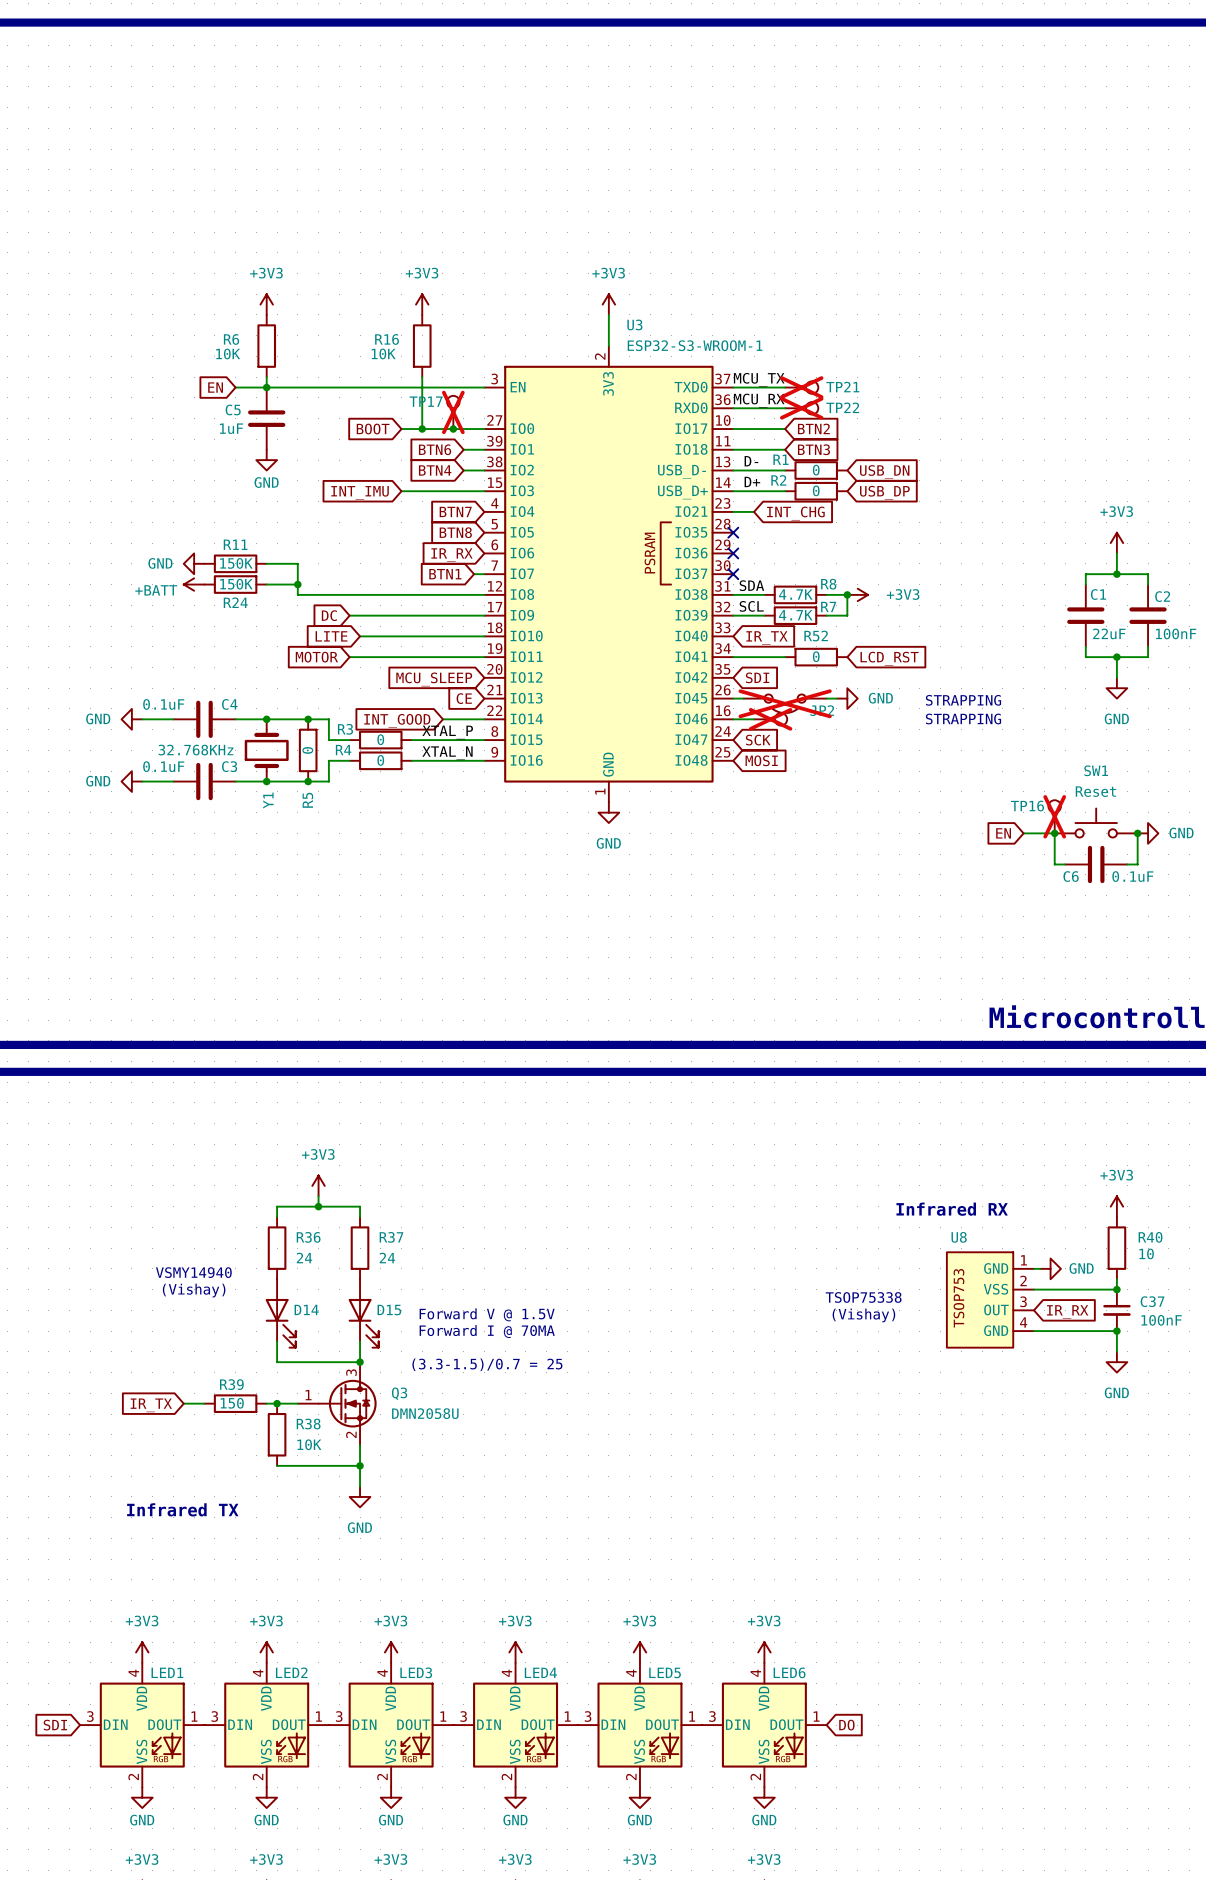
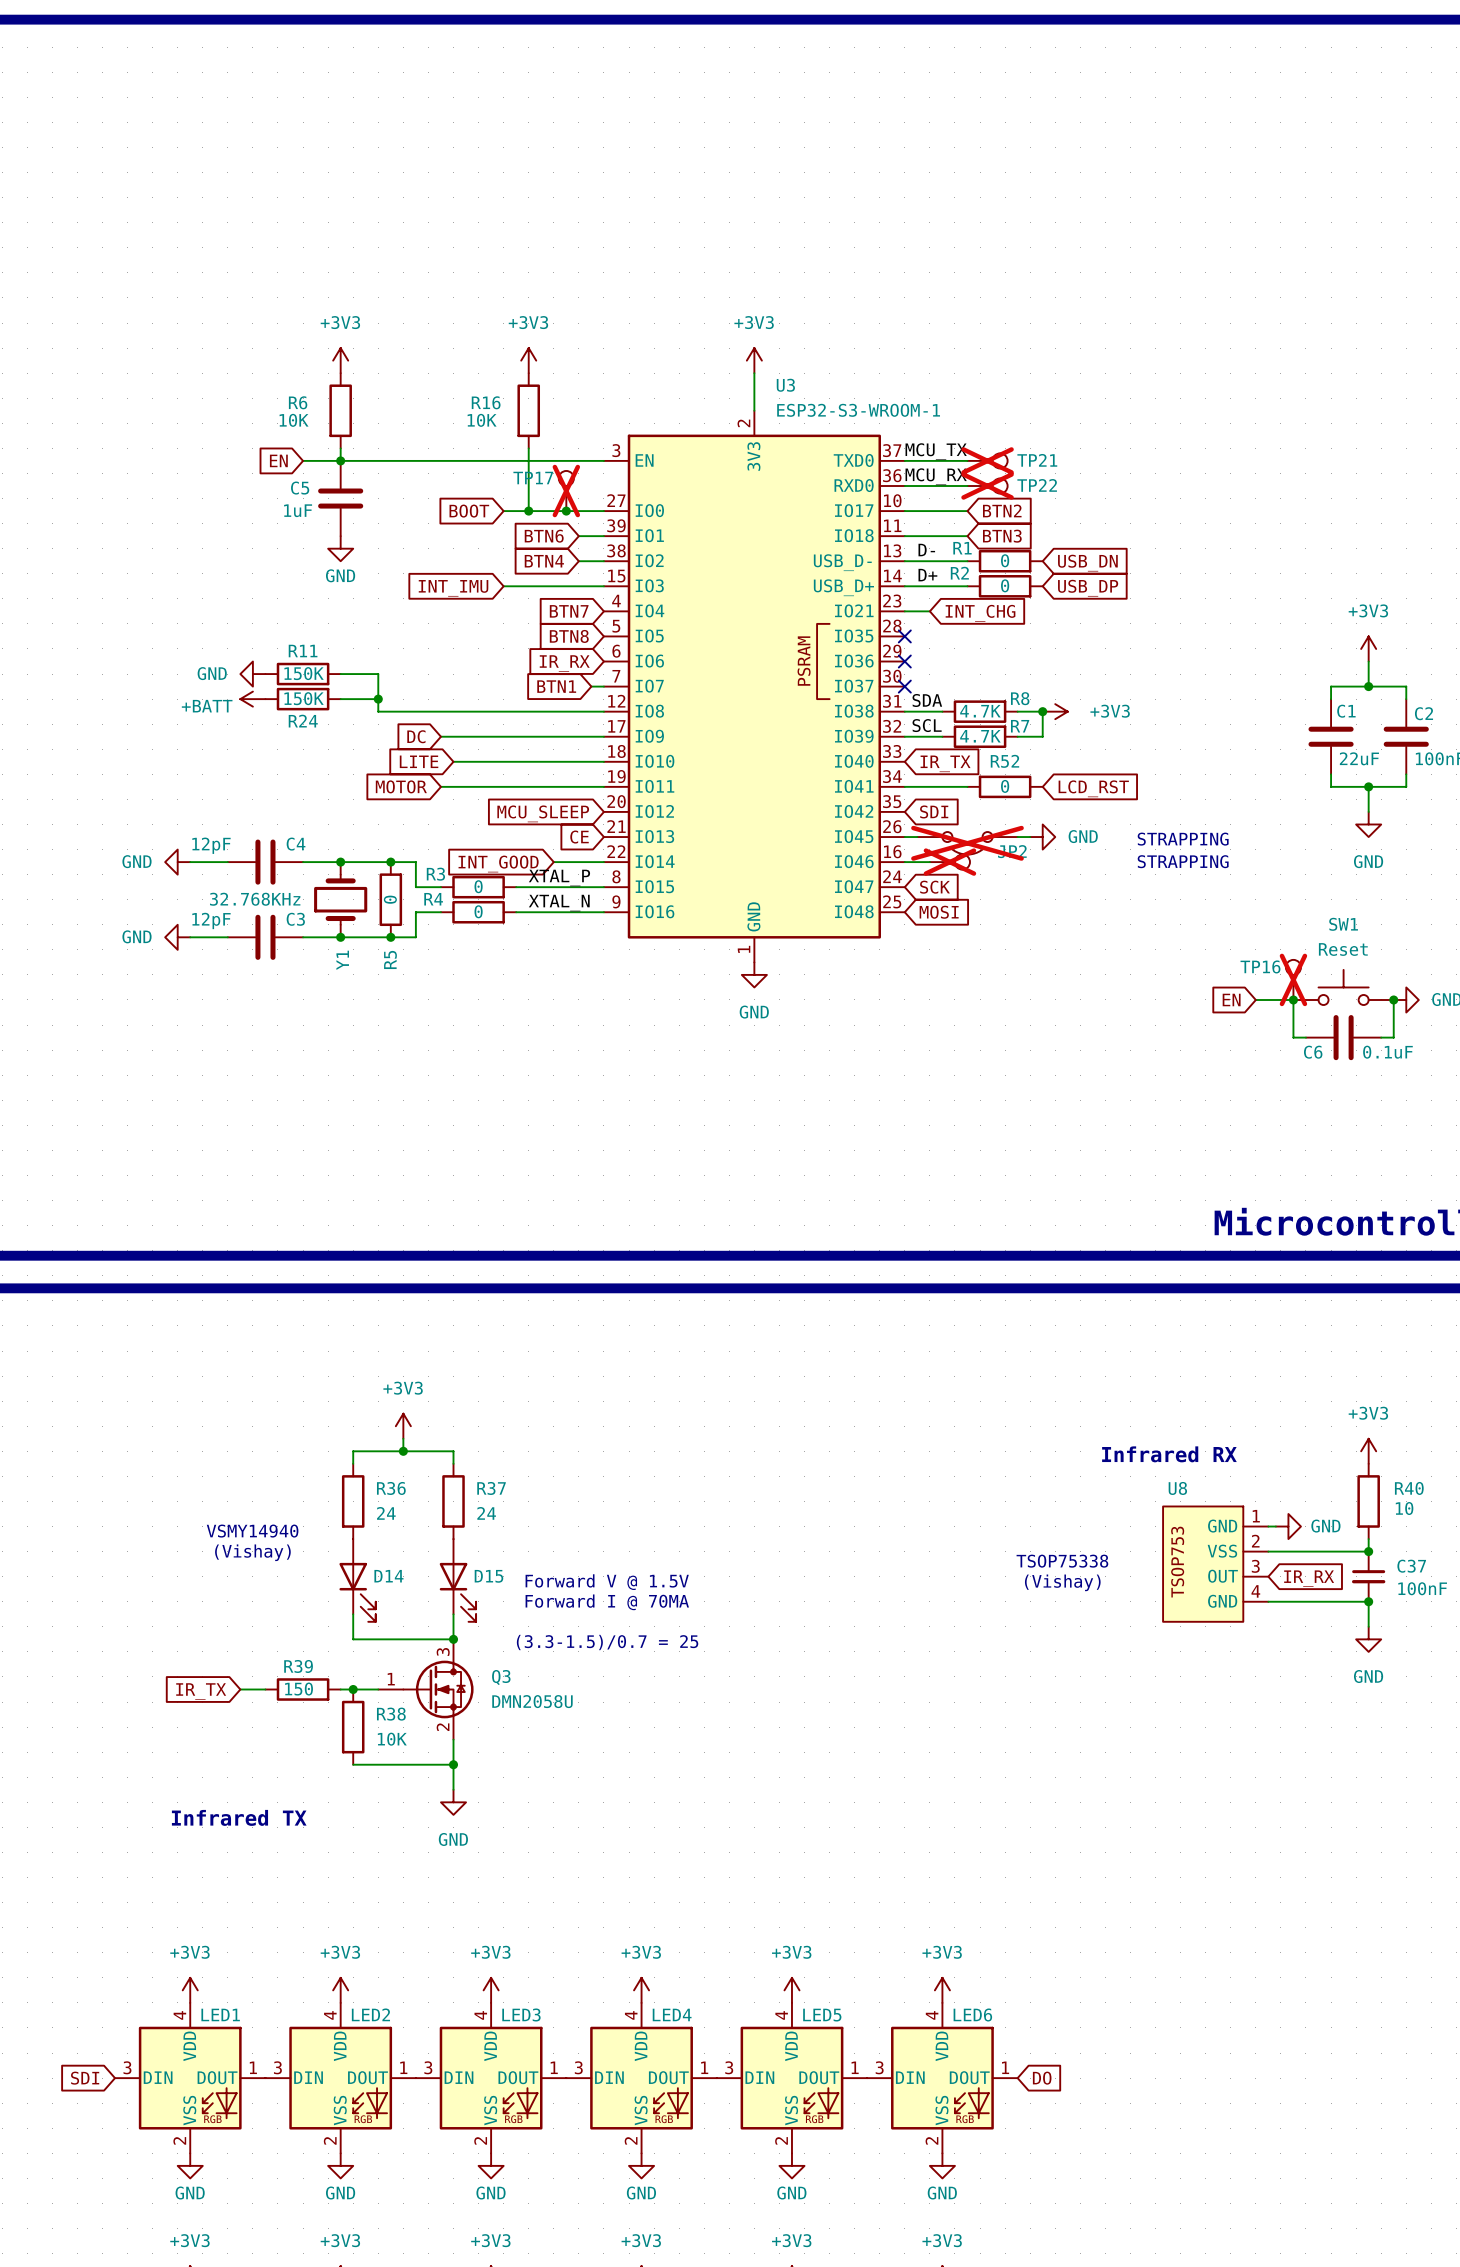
C4 value: 0.1uF (163, 704) -> 12pF (211, 845)
C3 value: 0.1uF (163, 766) -> 12pF (211, 920)

